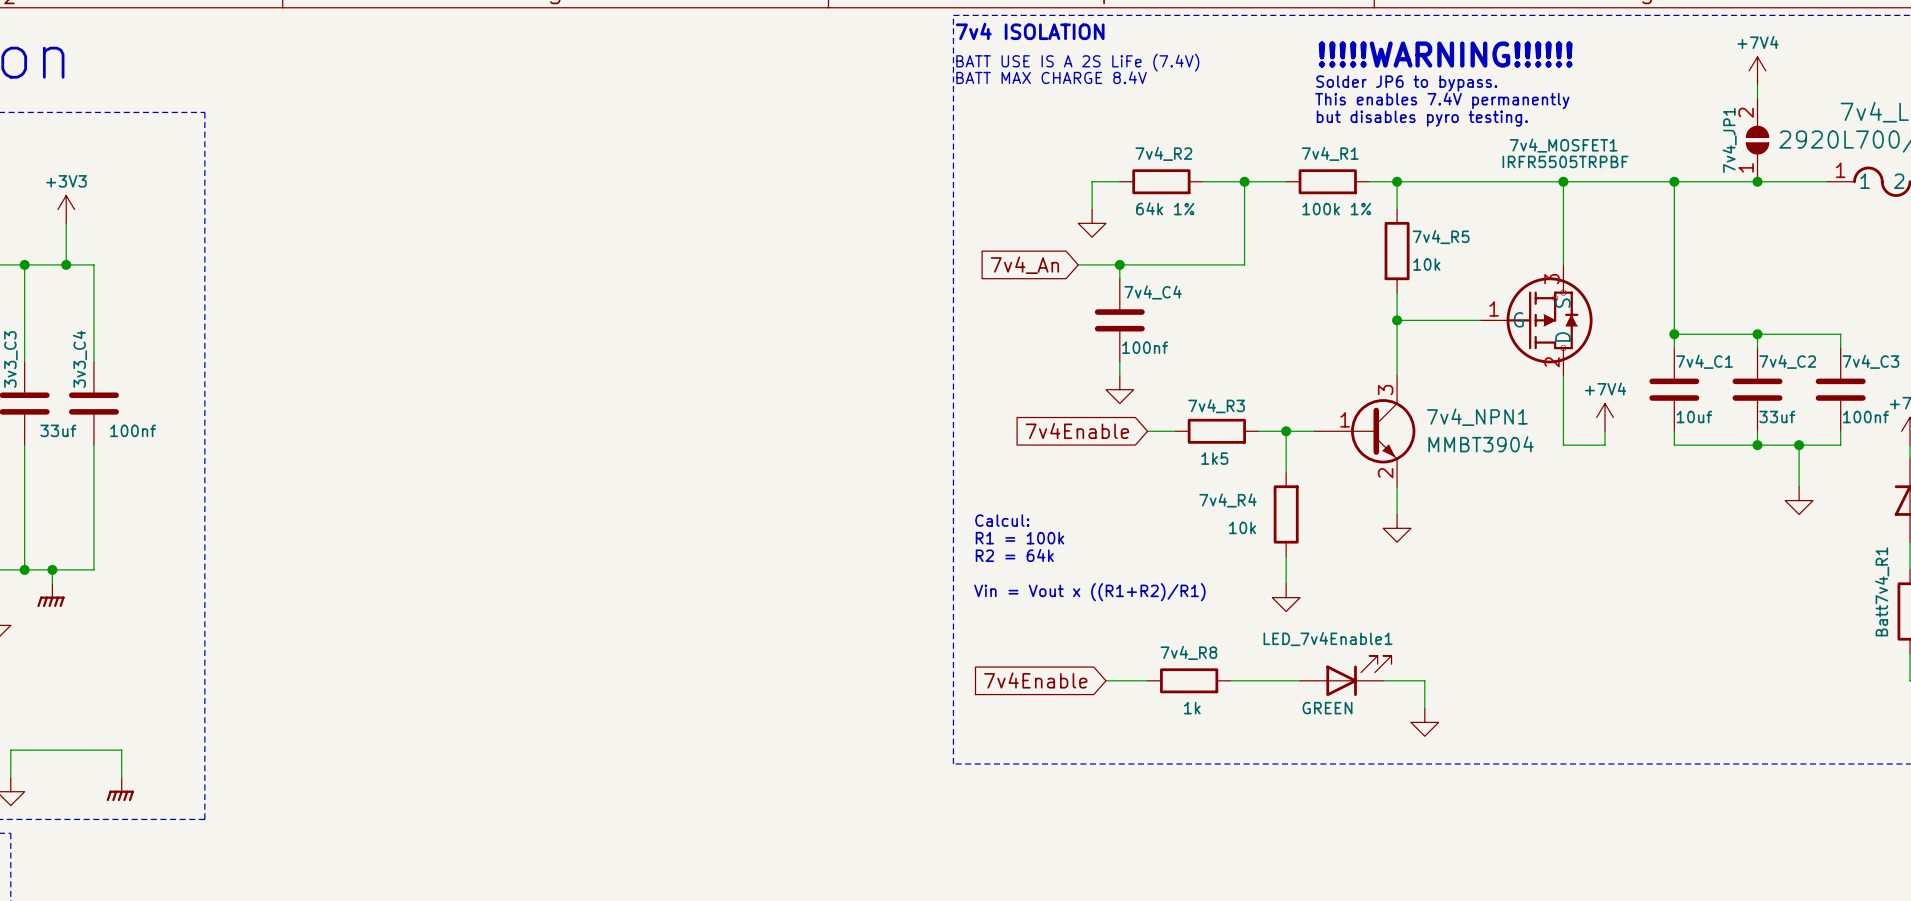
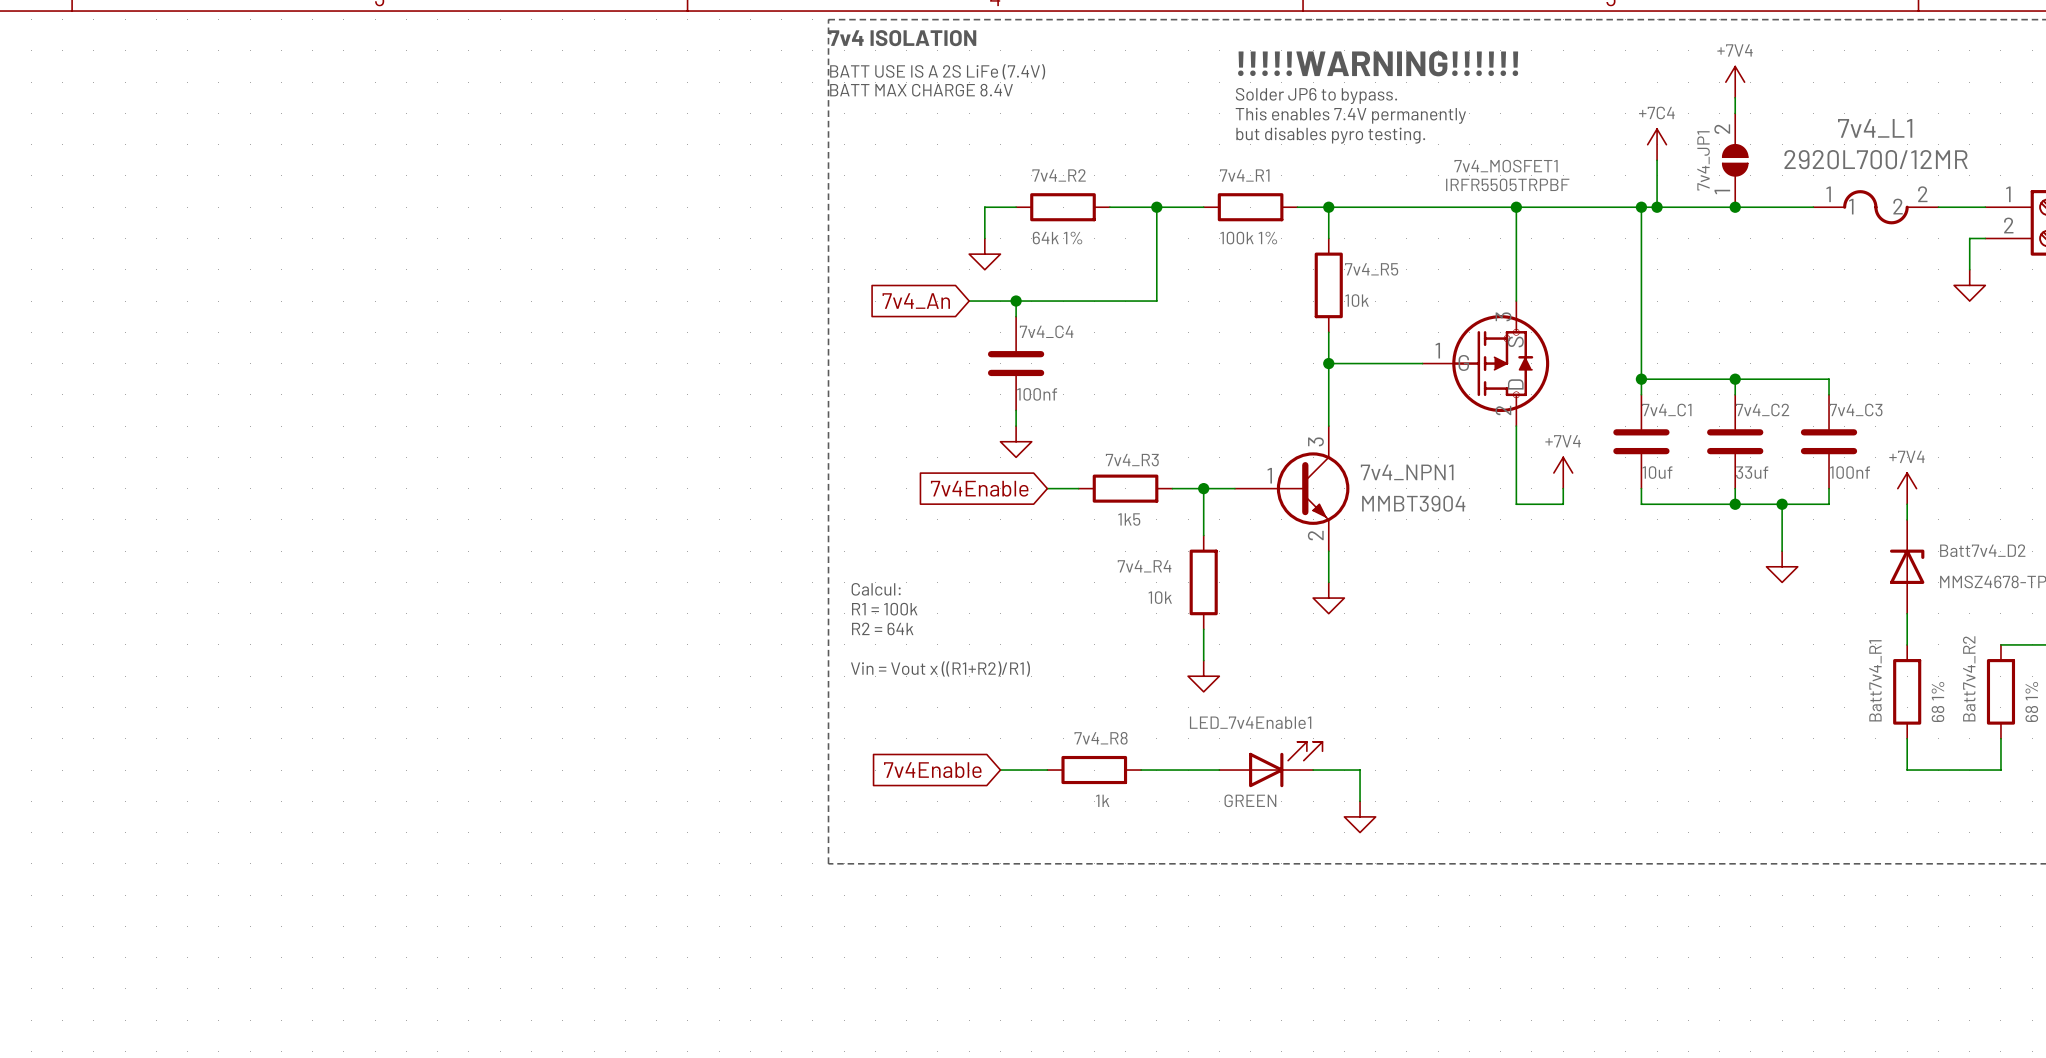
power symbol: none -> +7C4 (1657, 144)
wire: none -> (1657, 160) (1657, 207)
junction: none -> (1657, 207)

